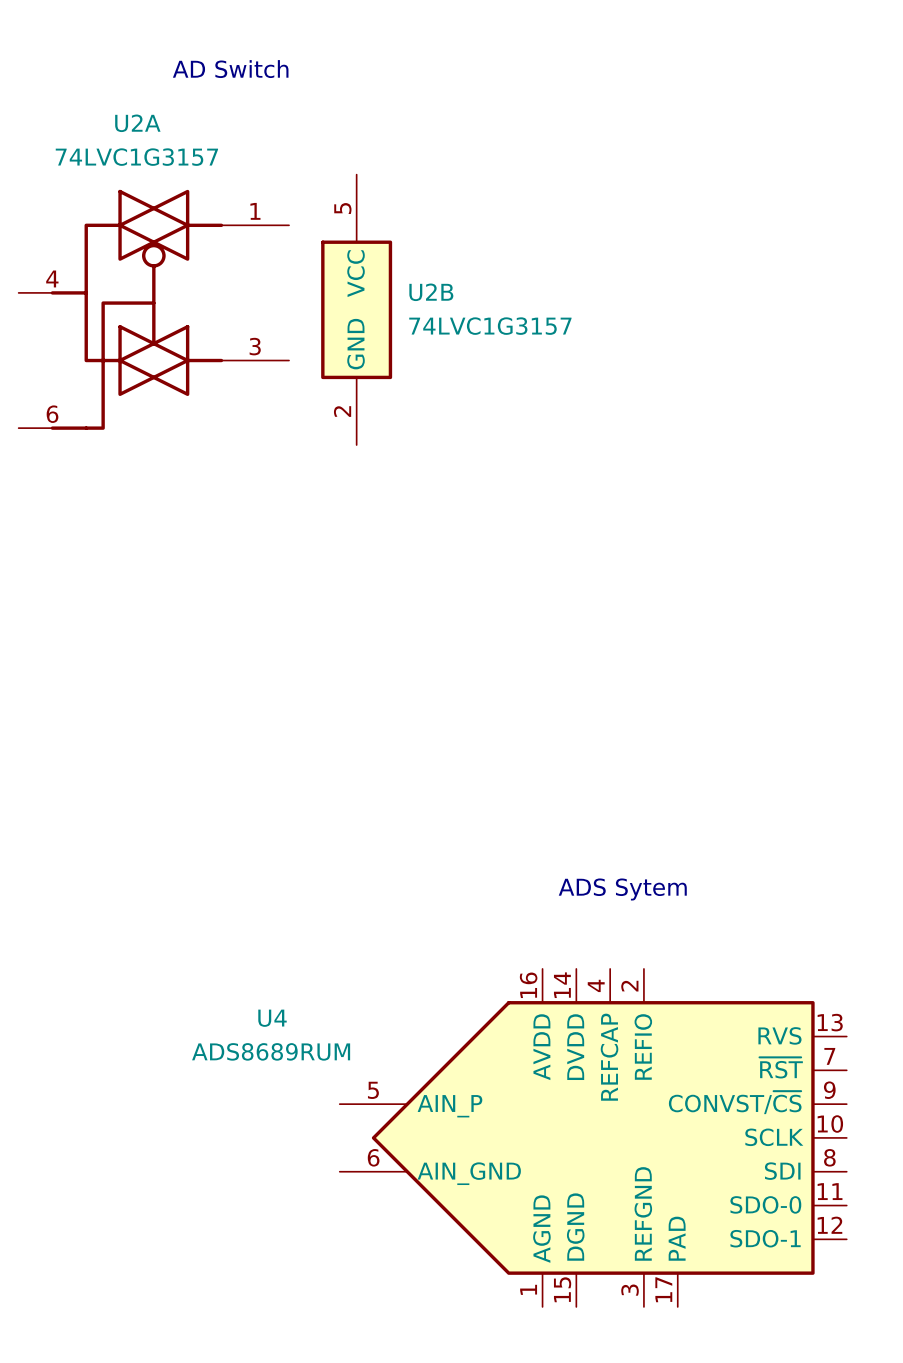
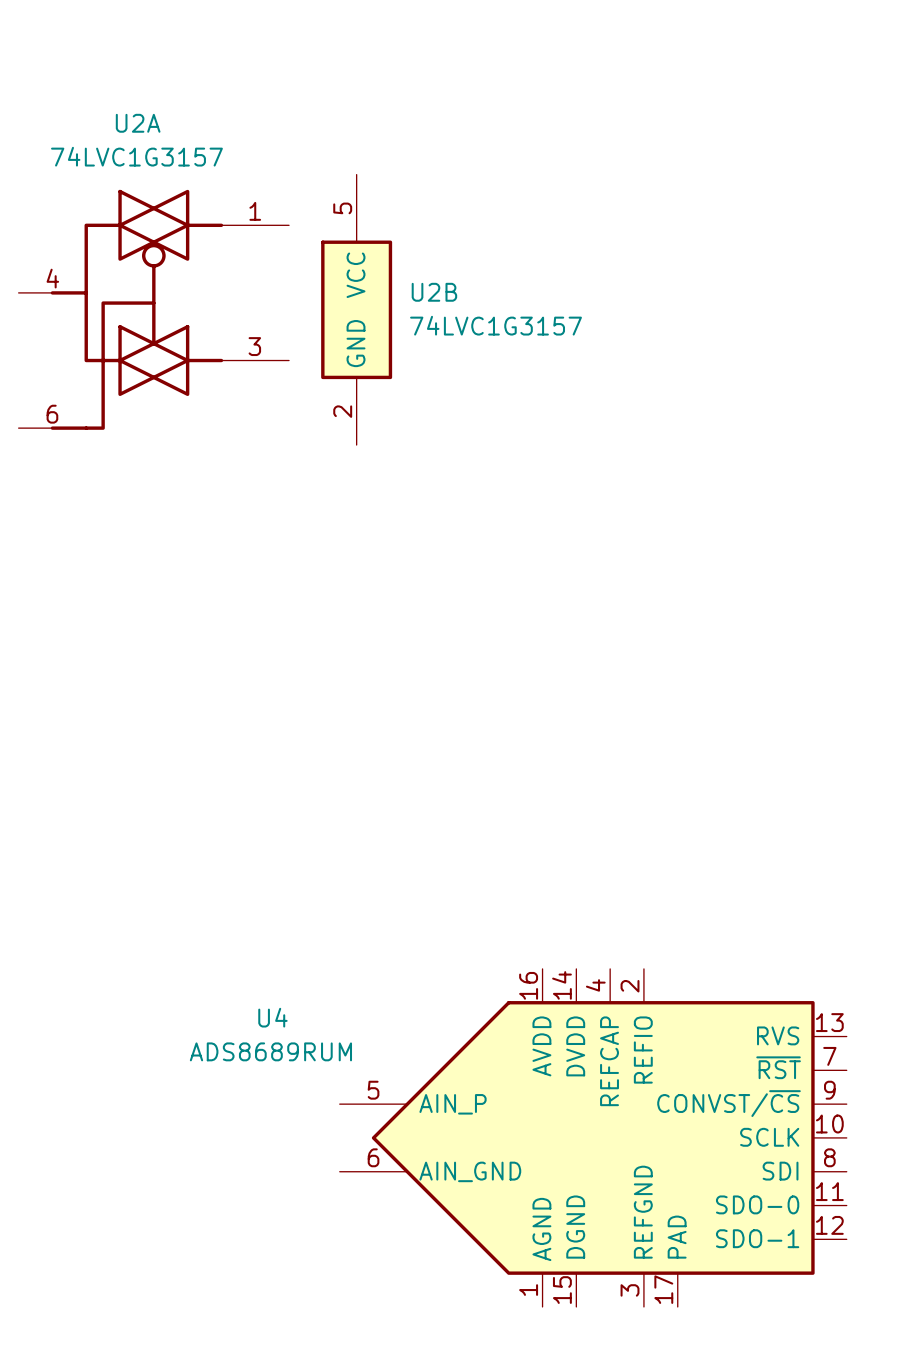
text: AD Switch (230, 69) -> none
text: ADS Sytem (622, 889) -> none

